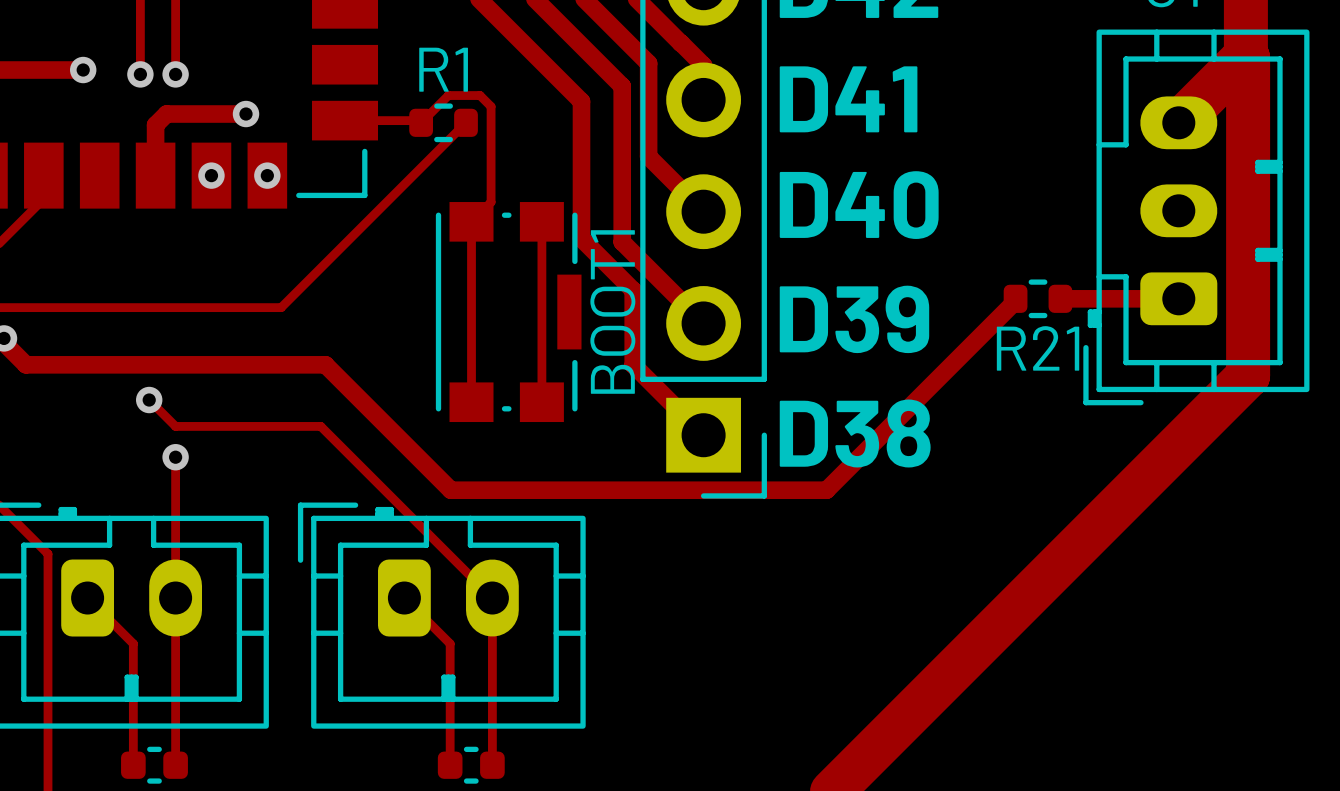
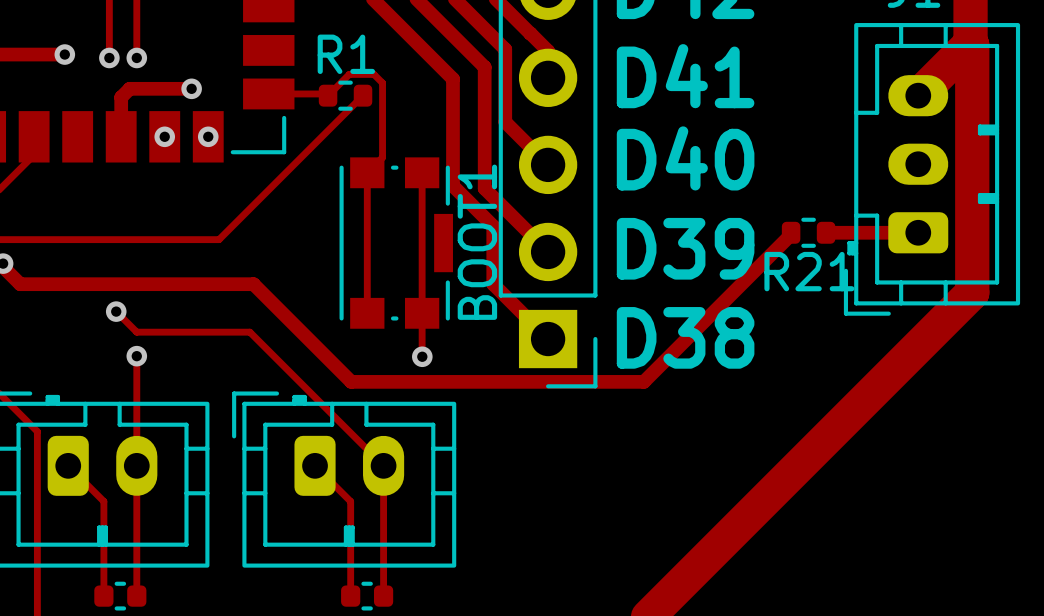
track: none -> (422, 313) (422, 350) (424, 352)
via: none -> (422, 356)

